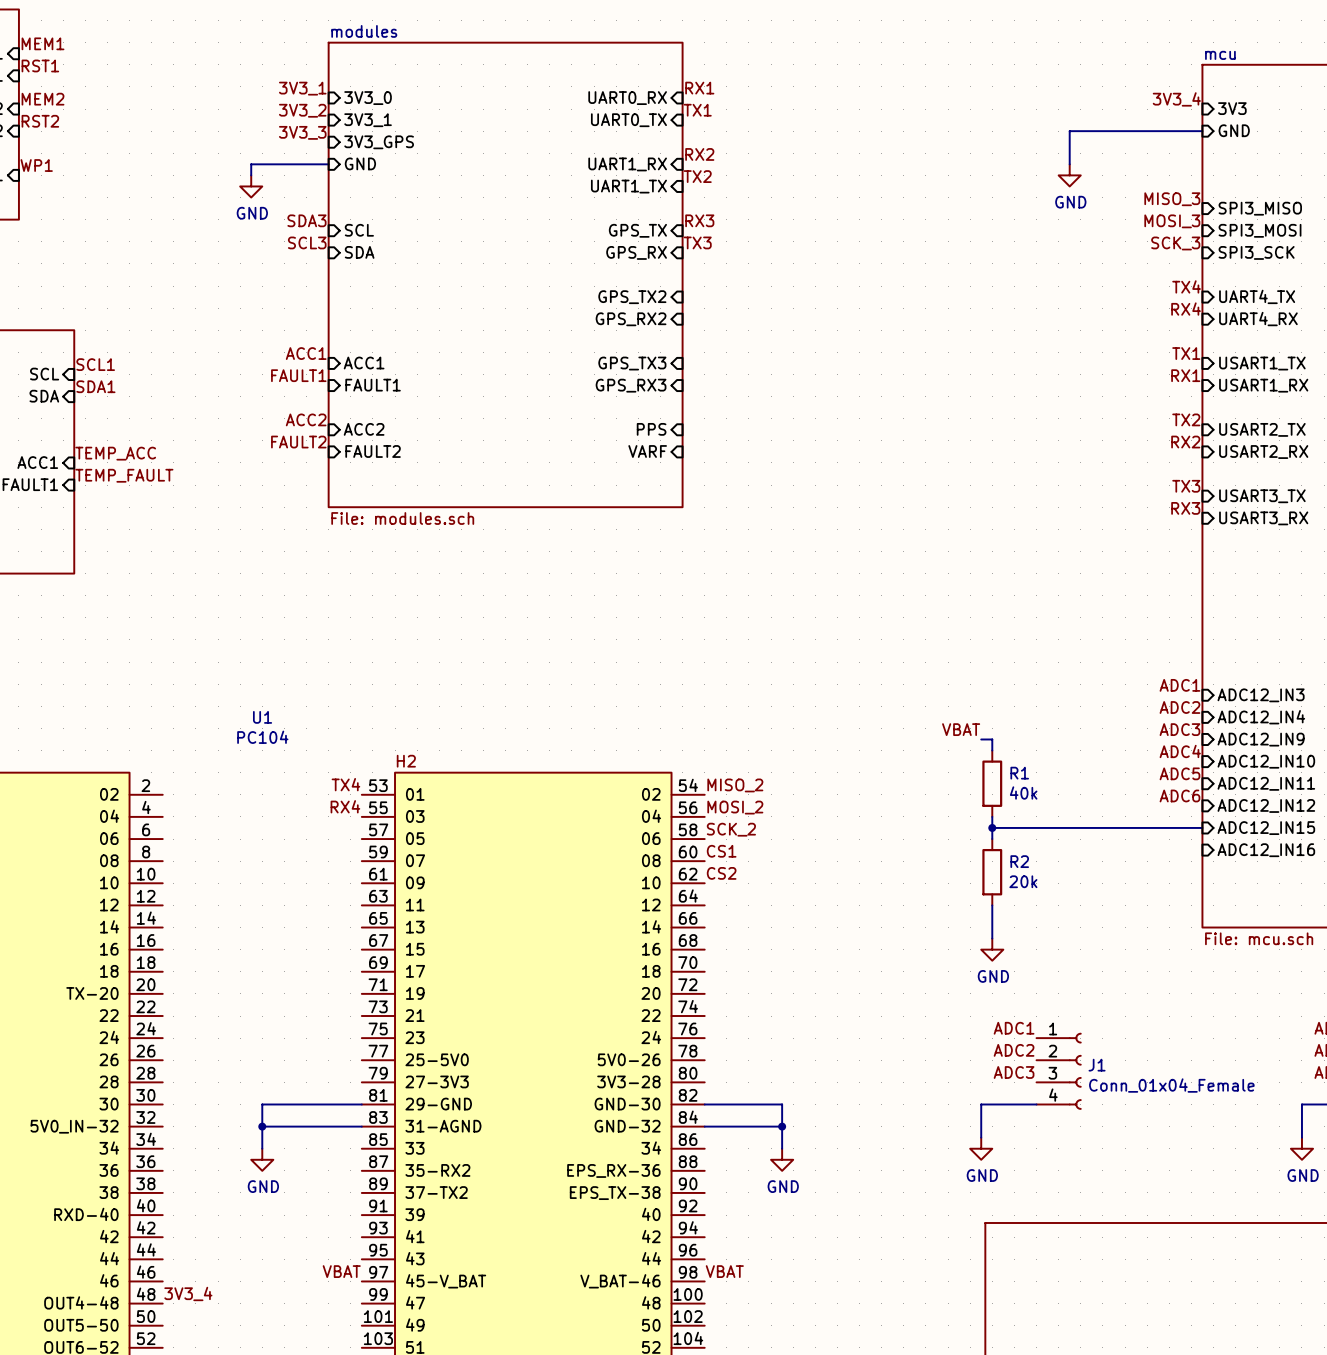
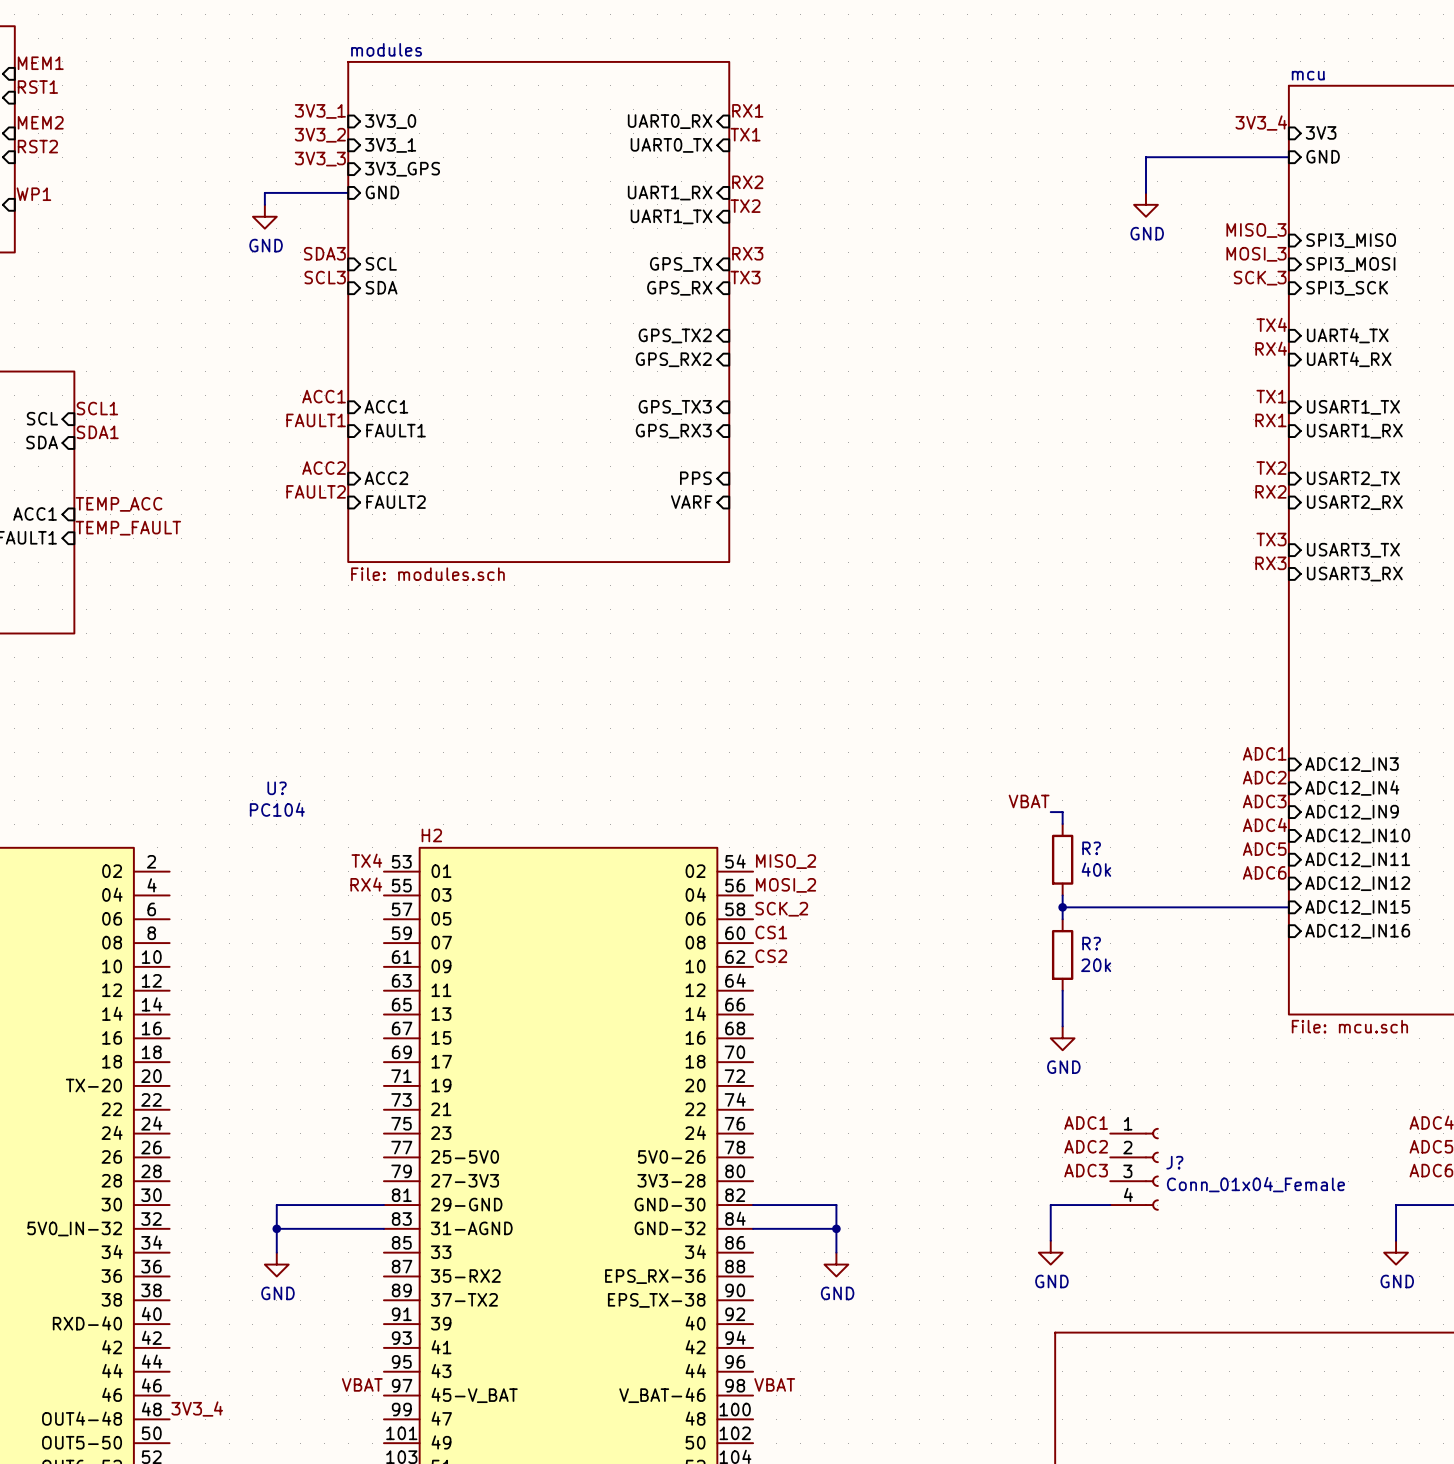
U1 name: U1 (262, 717) -> U? (277, 788)
R1 name: R1 (1019, 773) -> R? (1091, 848)
R2 name: R2 (1019, 861) -> R? (1091, 943)
J1 name: J1 (1097, 1065) -> J? (1174, 1162)

